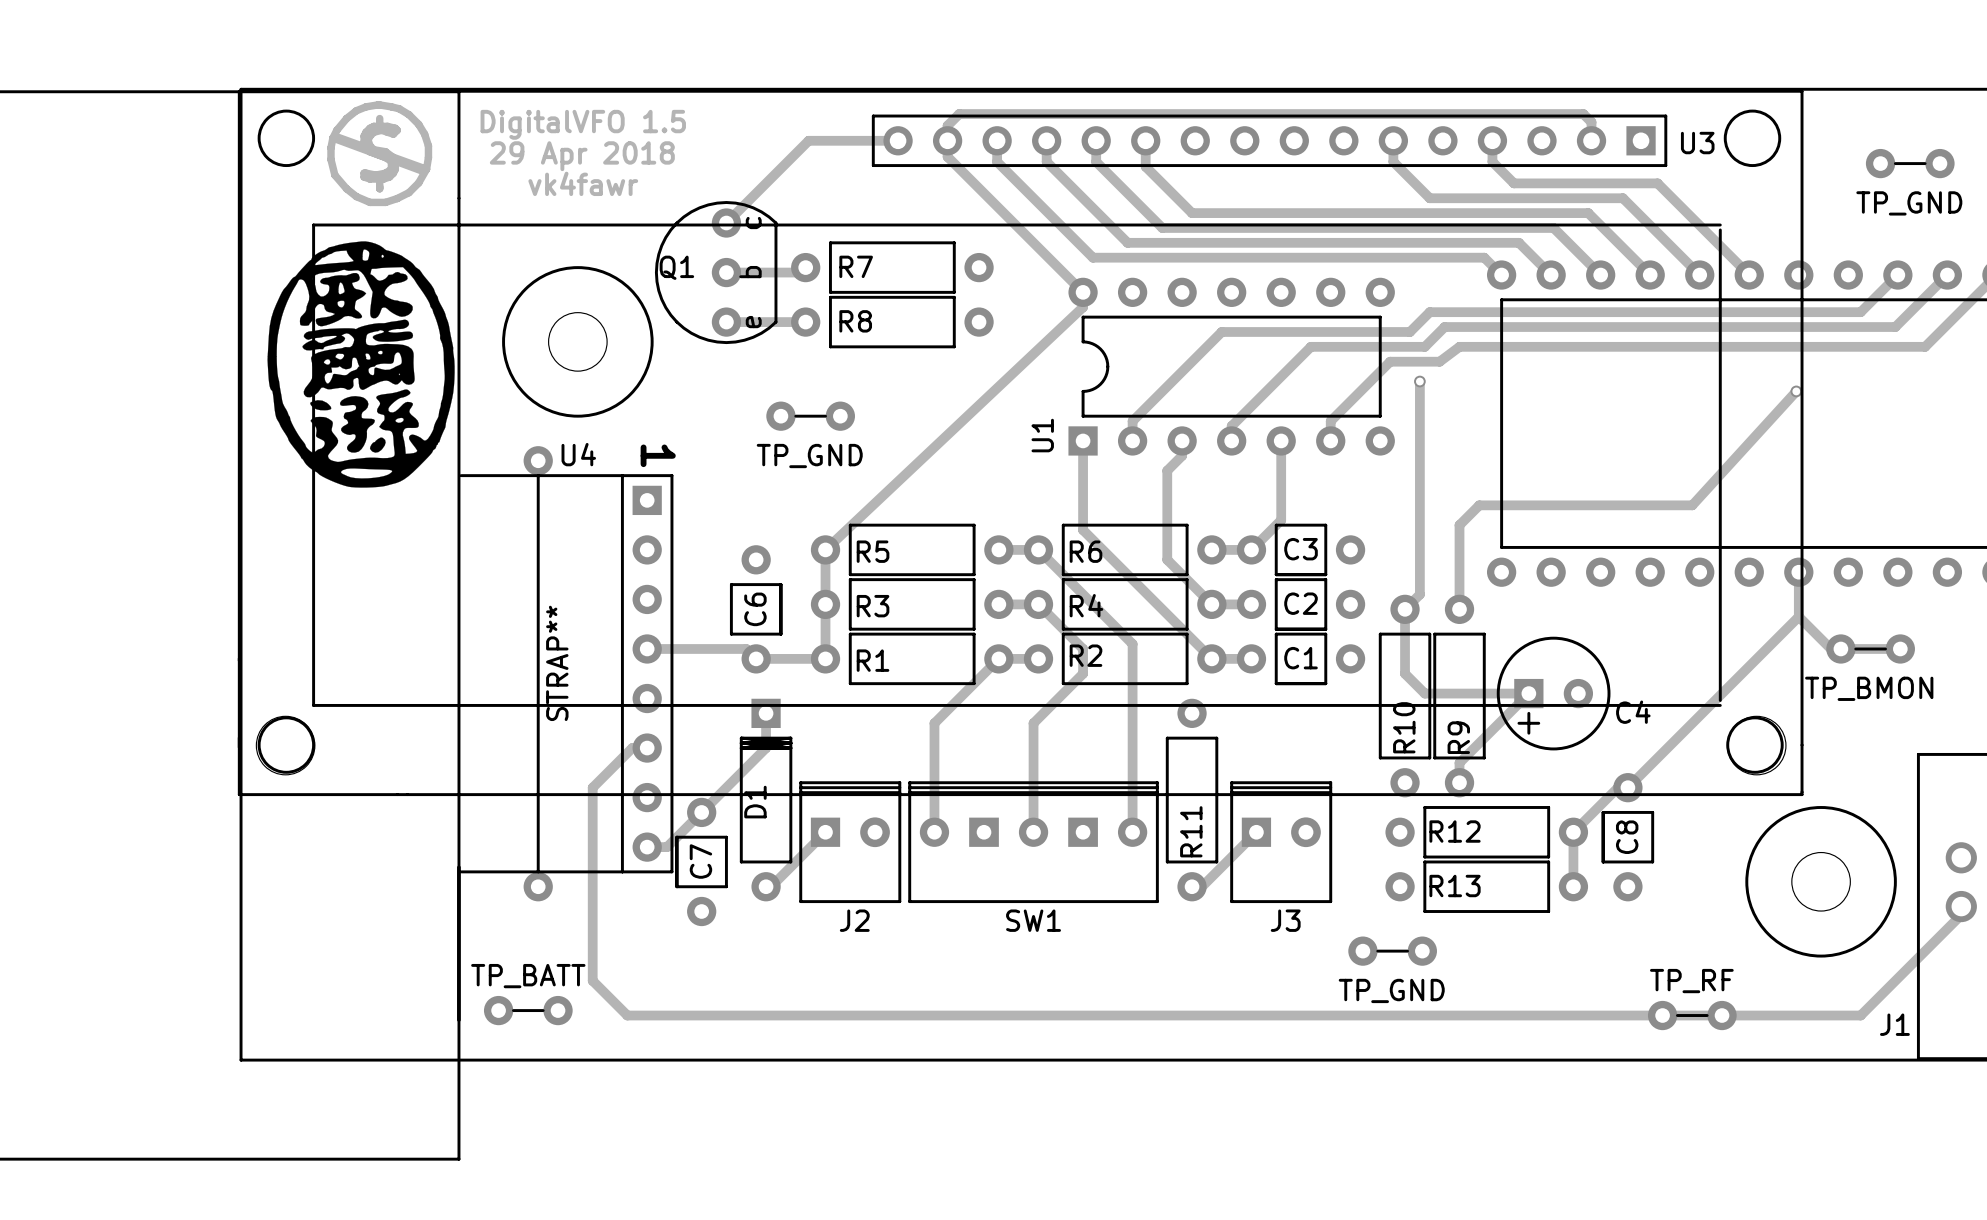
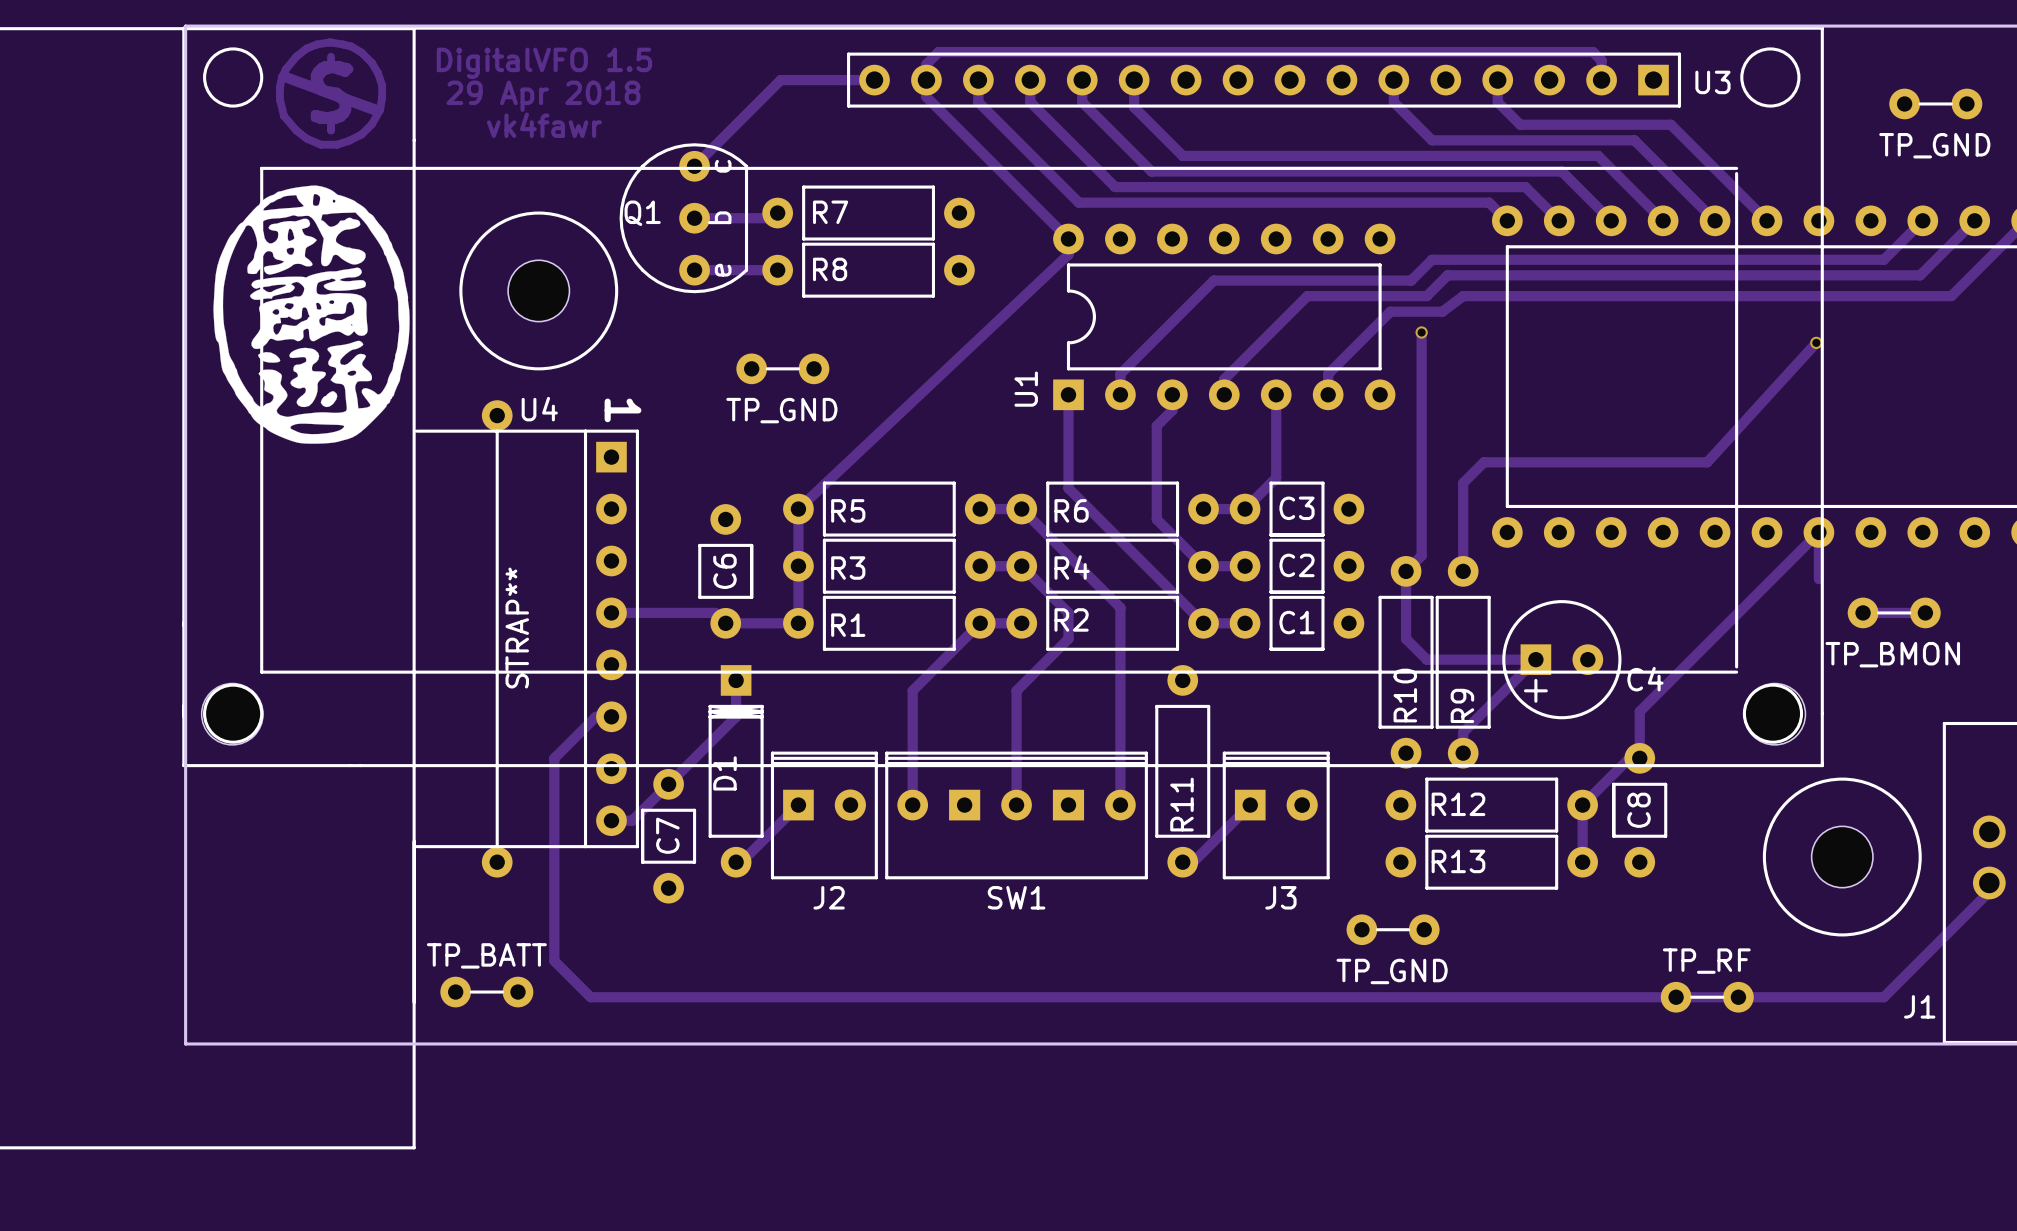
track: (1831, 648) (1798, 616) (1627, 787) -> (1824, 532) (1818, 532) (1639, 711) (1639, 758)

